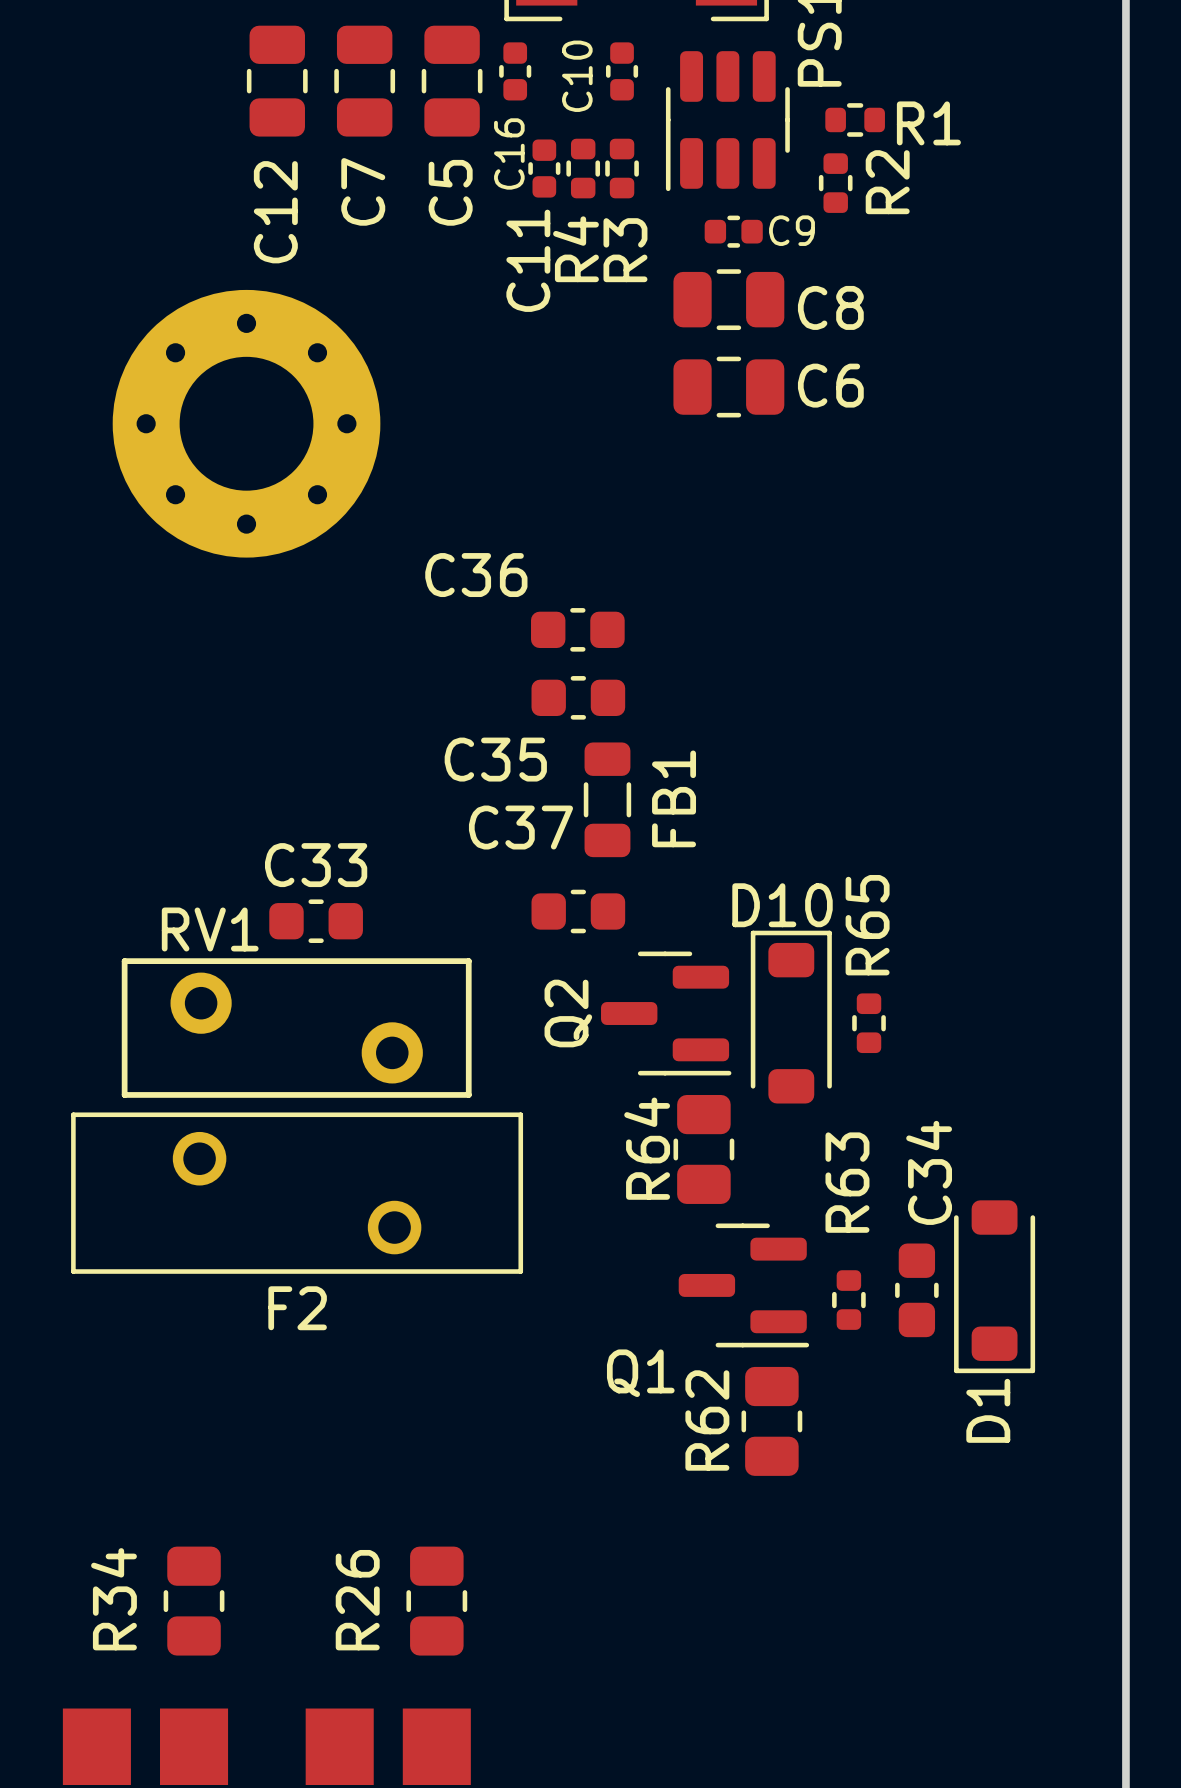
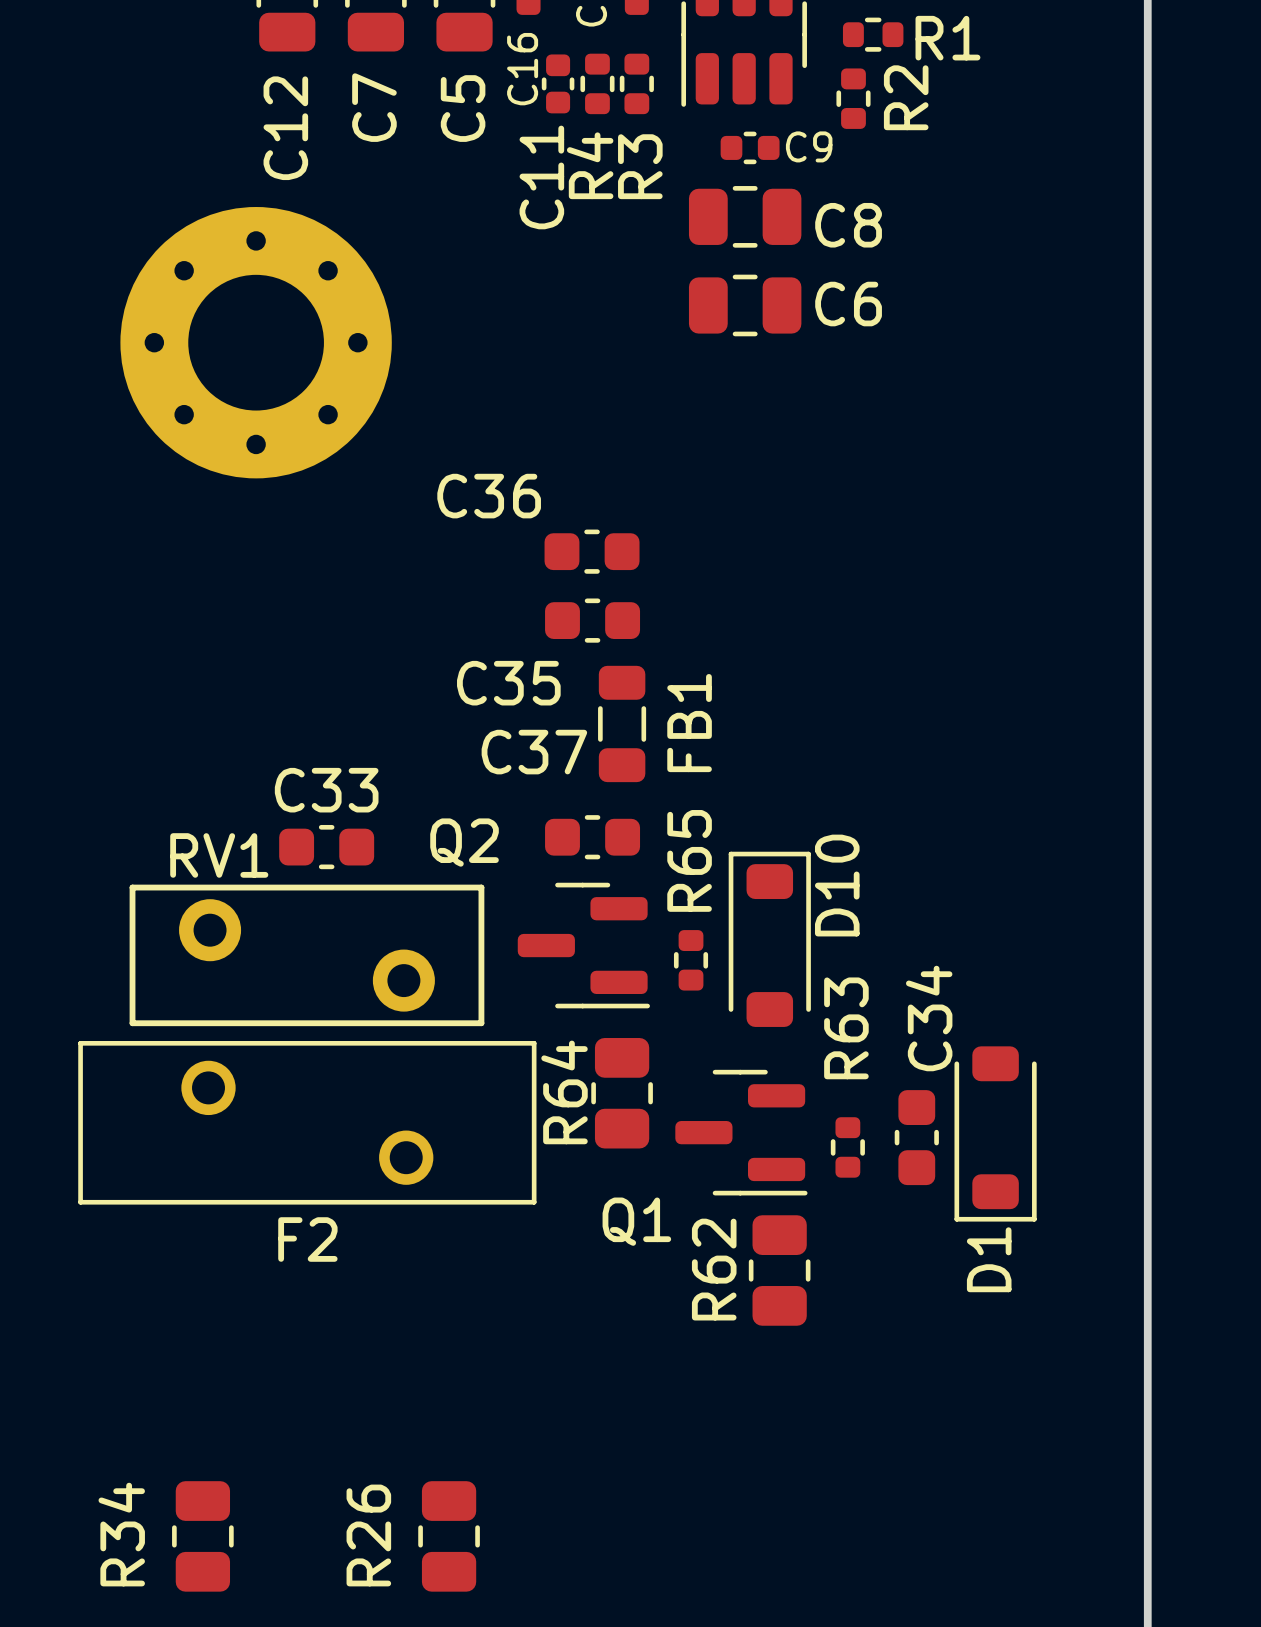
D10 name rotation: 0° (782, 905) -> 90° counterclockwise (837, 885)
Q2 name rotation: 0° (568, 1013) -> 90° clockwise (464, 842)
Q2 name position: Q2 (568, 1013) -> Q2 (464, 842)
Q2 position: (666, 1013) -> (583, 945)
D10 position: (791, 1017) -> (769, 939)
R65 position: (869, 1023) -> (691, 960)
R64 position: (703, 1149) -> (622, 1093)
Q1 position: (743, 1285) -> (741, 1132)
D1 position: (994, 1286) -> (995, 1133)
C34 position: (916, 1290) -> (916, 1137)
R63 position: (848, 1300) -> (847, 1147)
R62 position: (771, 1421) -> (779, 1270)

